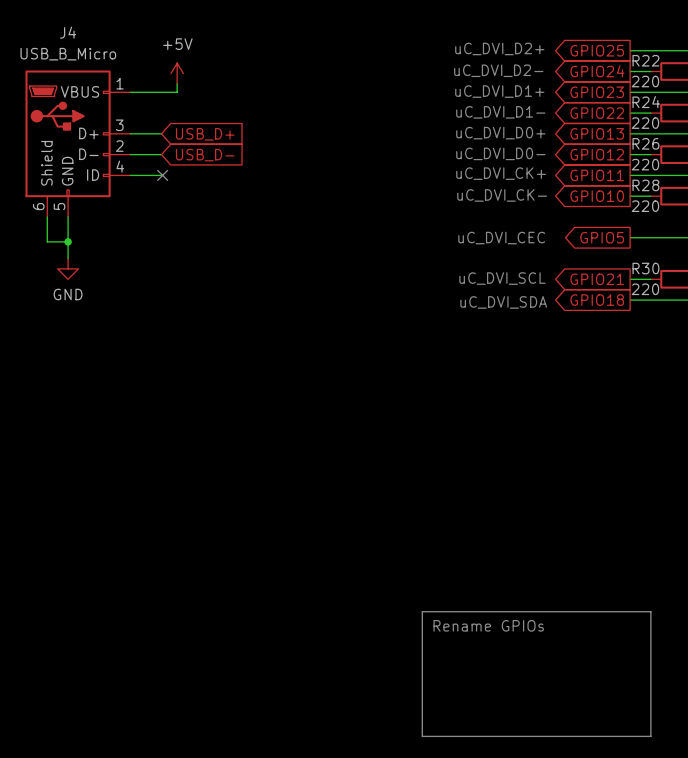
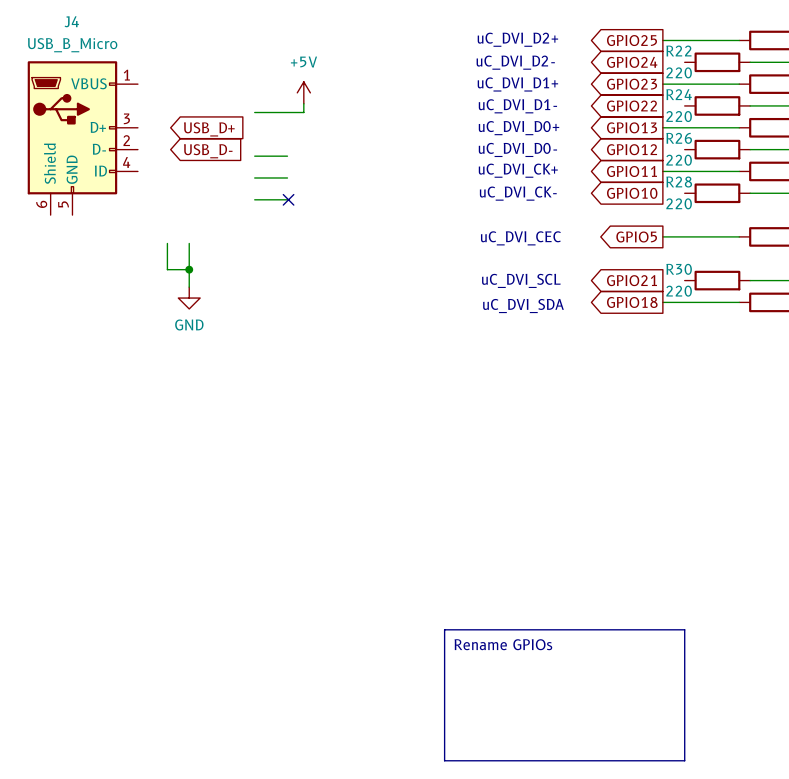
wire: (630, 71) (650, 71) -> none
power symbol position: +5V (177, 73) -> +5V (303, 92)
wire: (177, 83) (177, 92) (130, 92) -> (303, 103) (303, 112) (254, 112)
wire: (630, 113) (650, 113) -> none
wire: (130, 133) (161, 133) -> (254, 156) (287, 156)
wire: (130, 154) (161, 154) -> (254, 177) (287, 177)
wire: (630, 154) (650, 154) -> none
wire: (130, 175) (162, 175) -> (254, 199) (288, 199)
no-connect mark: (162, 175) -> none
wire: (630, 196) (650, 196) -> none
no-connect mark: none -> (288, 199)
wire: (47, 216) (47, 241) (68, 241) -> (167, 243) (167, 269) (189, 269)
wire: (68, 216) (68, 258) -> (189, 243) (189, 287)
junction: (68, 241) -> none
power symbol position: GND (68, 268) -> GND (189, 298)
junction: none -> (189, 269)
wire: (630, 279) (650, 279) -> none

